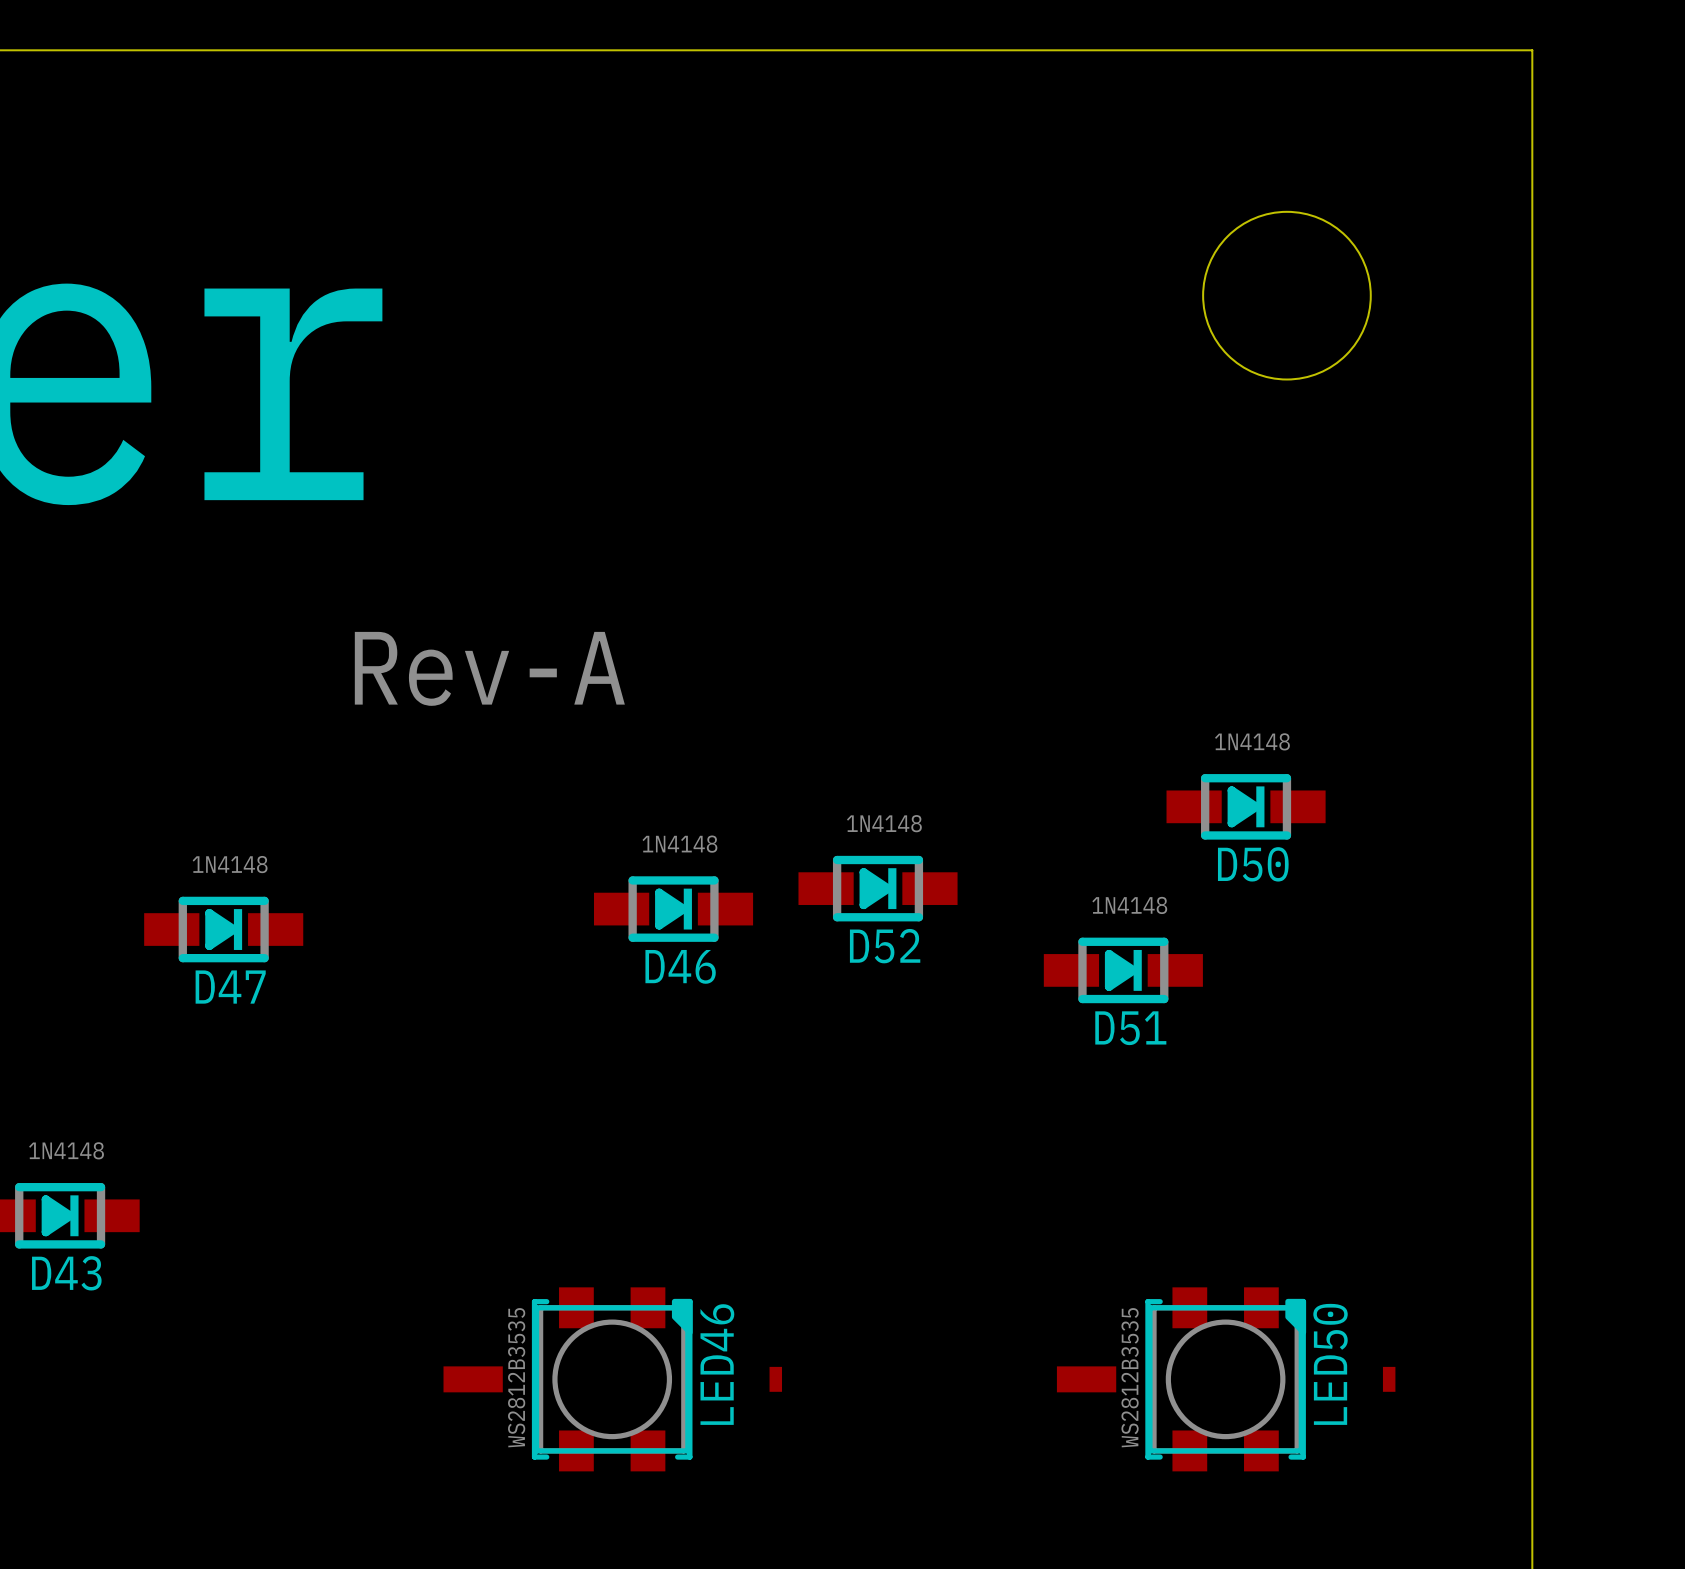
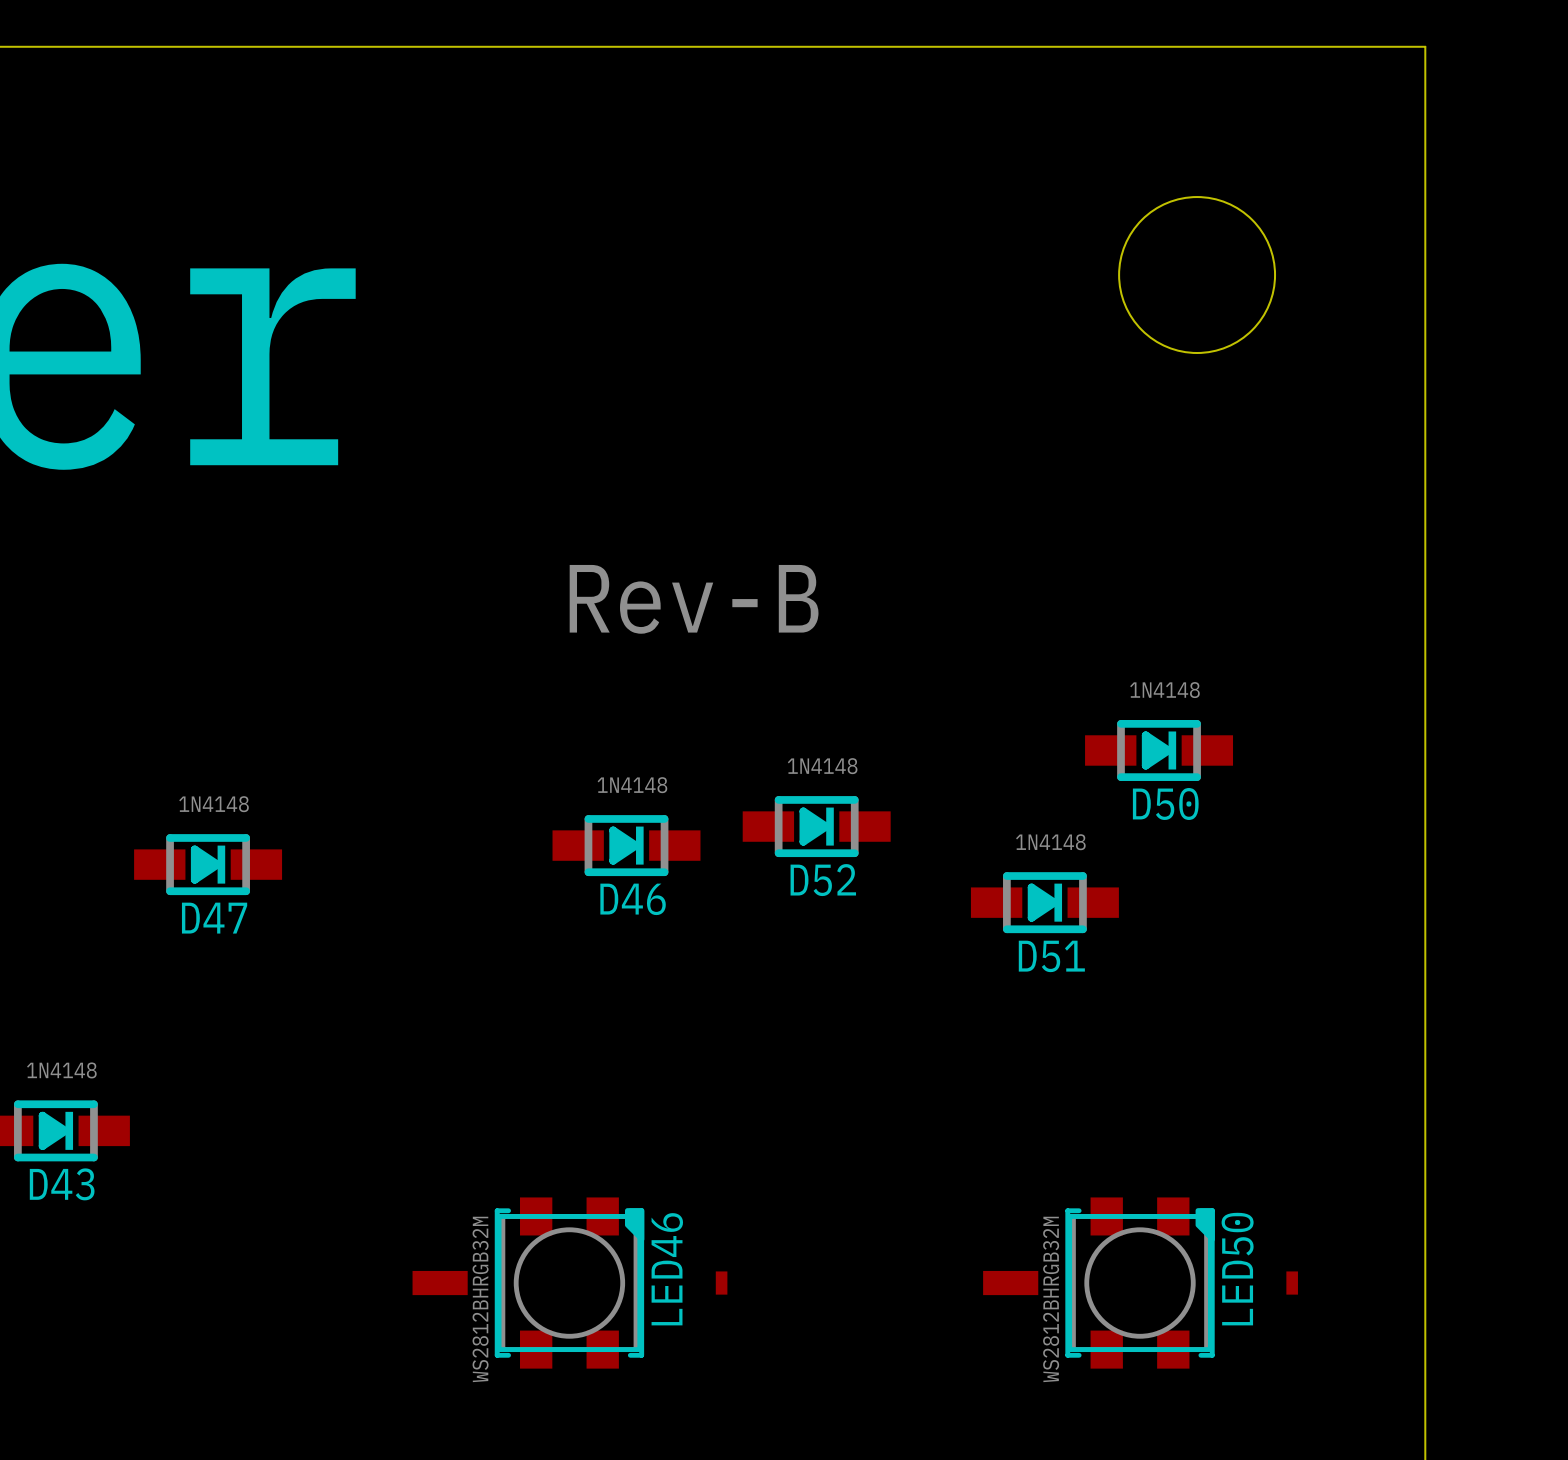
text: Rev-A (489, 668) -> Rev-B (694, 599)
LED46 value: WS2812B3535 (516, 1377) -> WS2812BHRGB32M (480, 1299)
LED50 value: WS2812B3535 (1130, 1377) -> WS2812BHRGB32M (1051, 1299)

